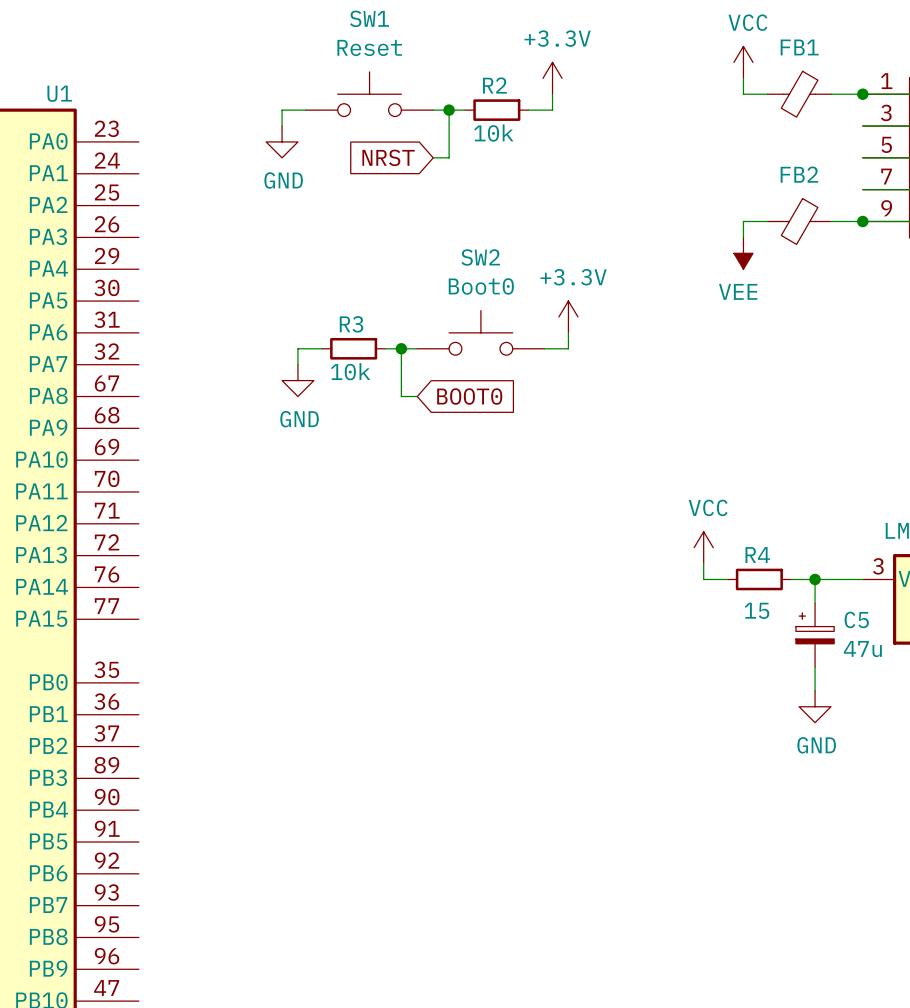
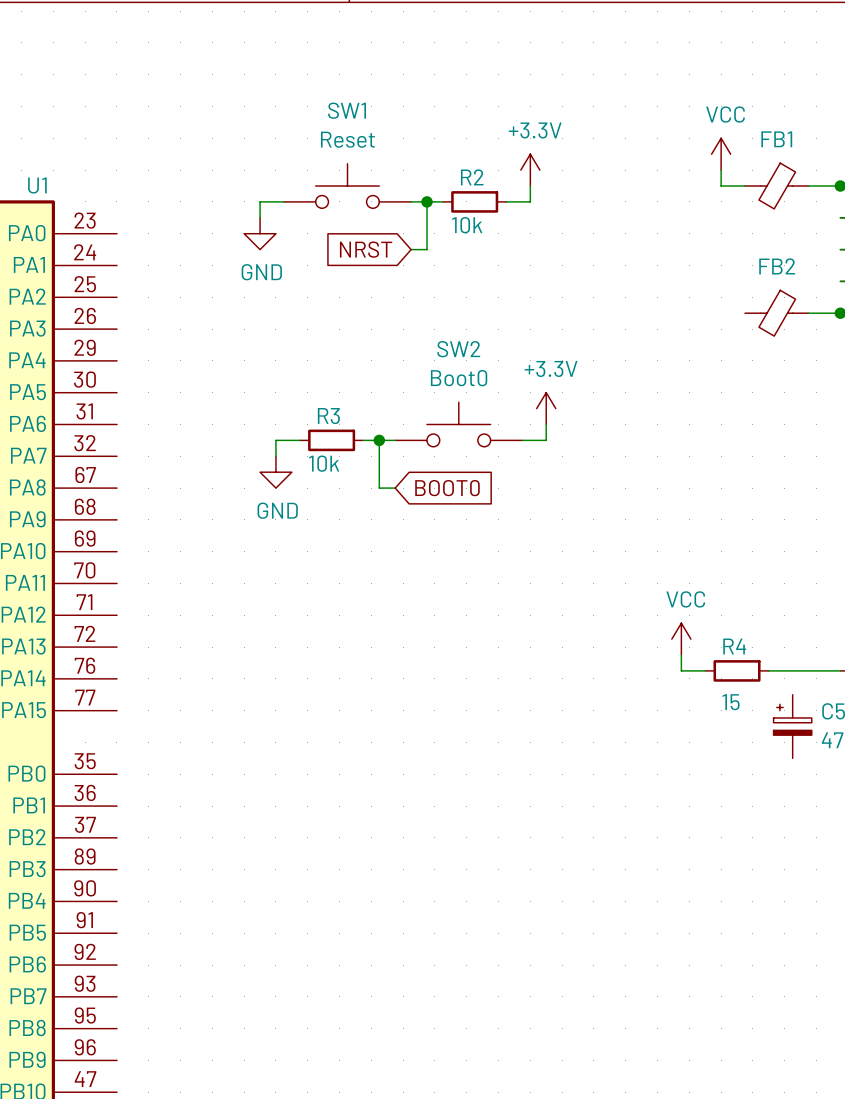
wire: (767, 221) (743, 221) (743, 237) -> none
power symbol: VEE (743, 253) -> none
wire: (815, 579) (815, 603) -> none
junction: (815, 579) -> none
wire: (815, 666) (815, 690) -> none
power symbol: GND (815, 706) -> none

